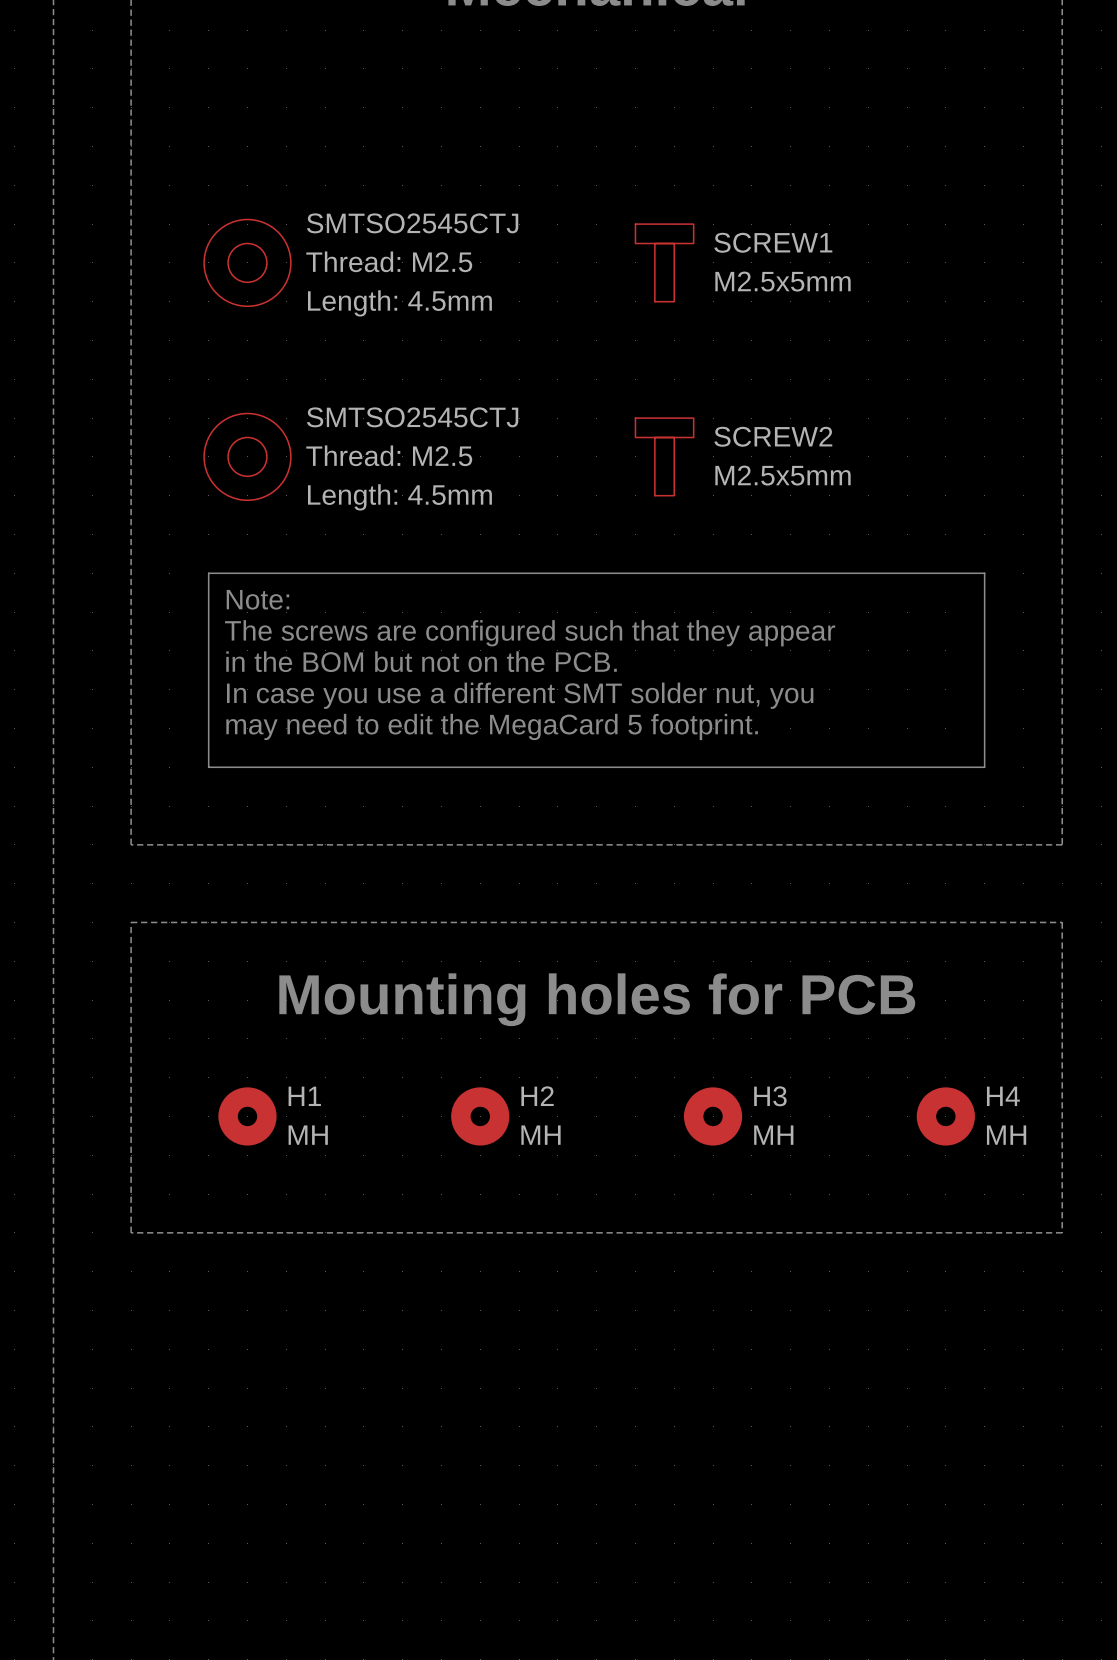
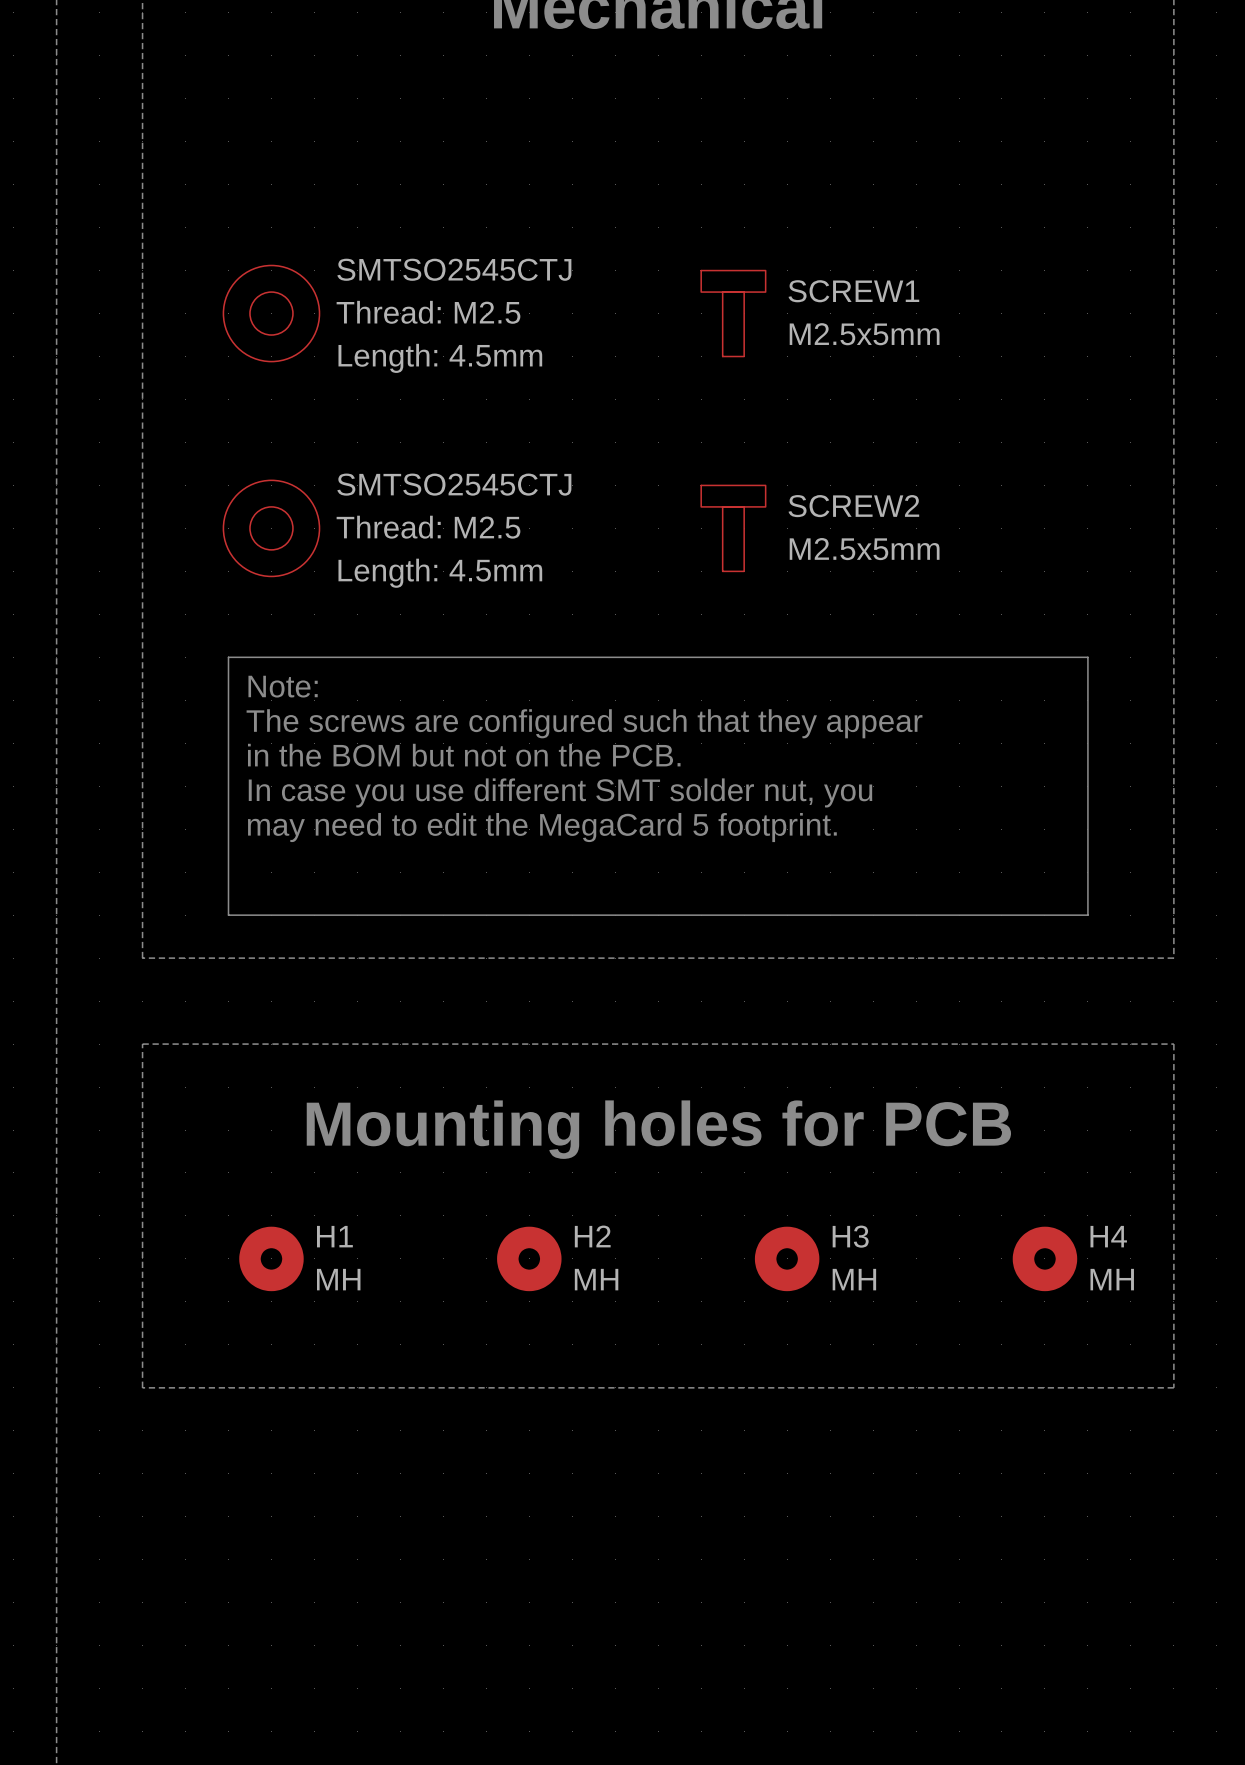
text: In case you use a different SMT solder nut, you (520, 695) -> In case you use different SMT solder nut, you (560, 792)
line: (208, 767) (984, 767) -> (228, 872) (228, 915) (1087, 915) (1087, 872)

